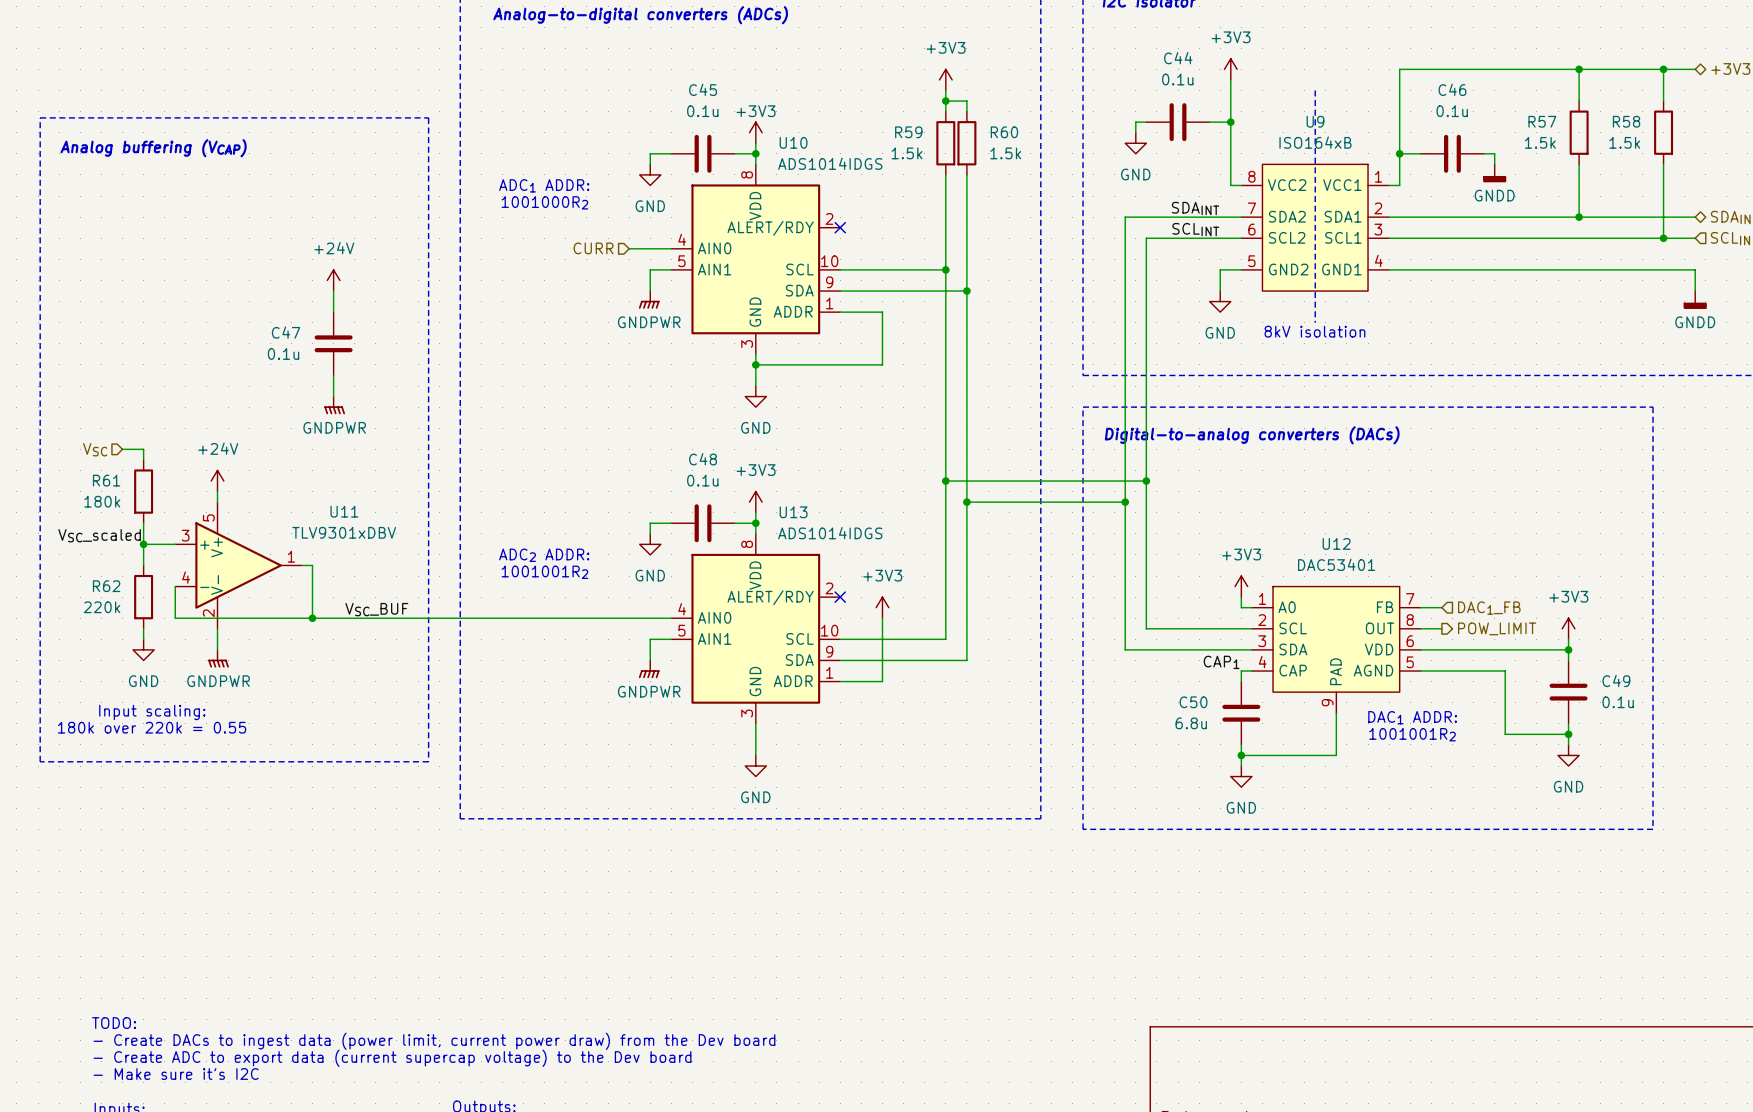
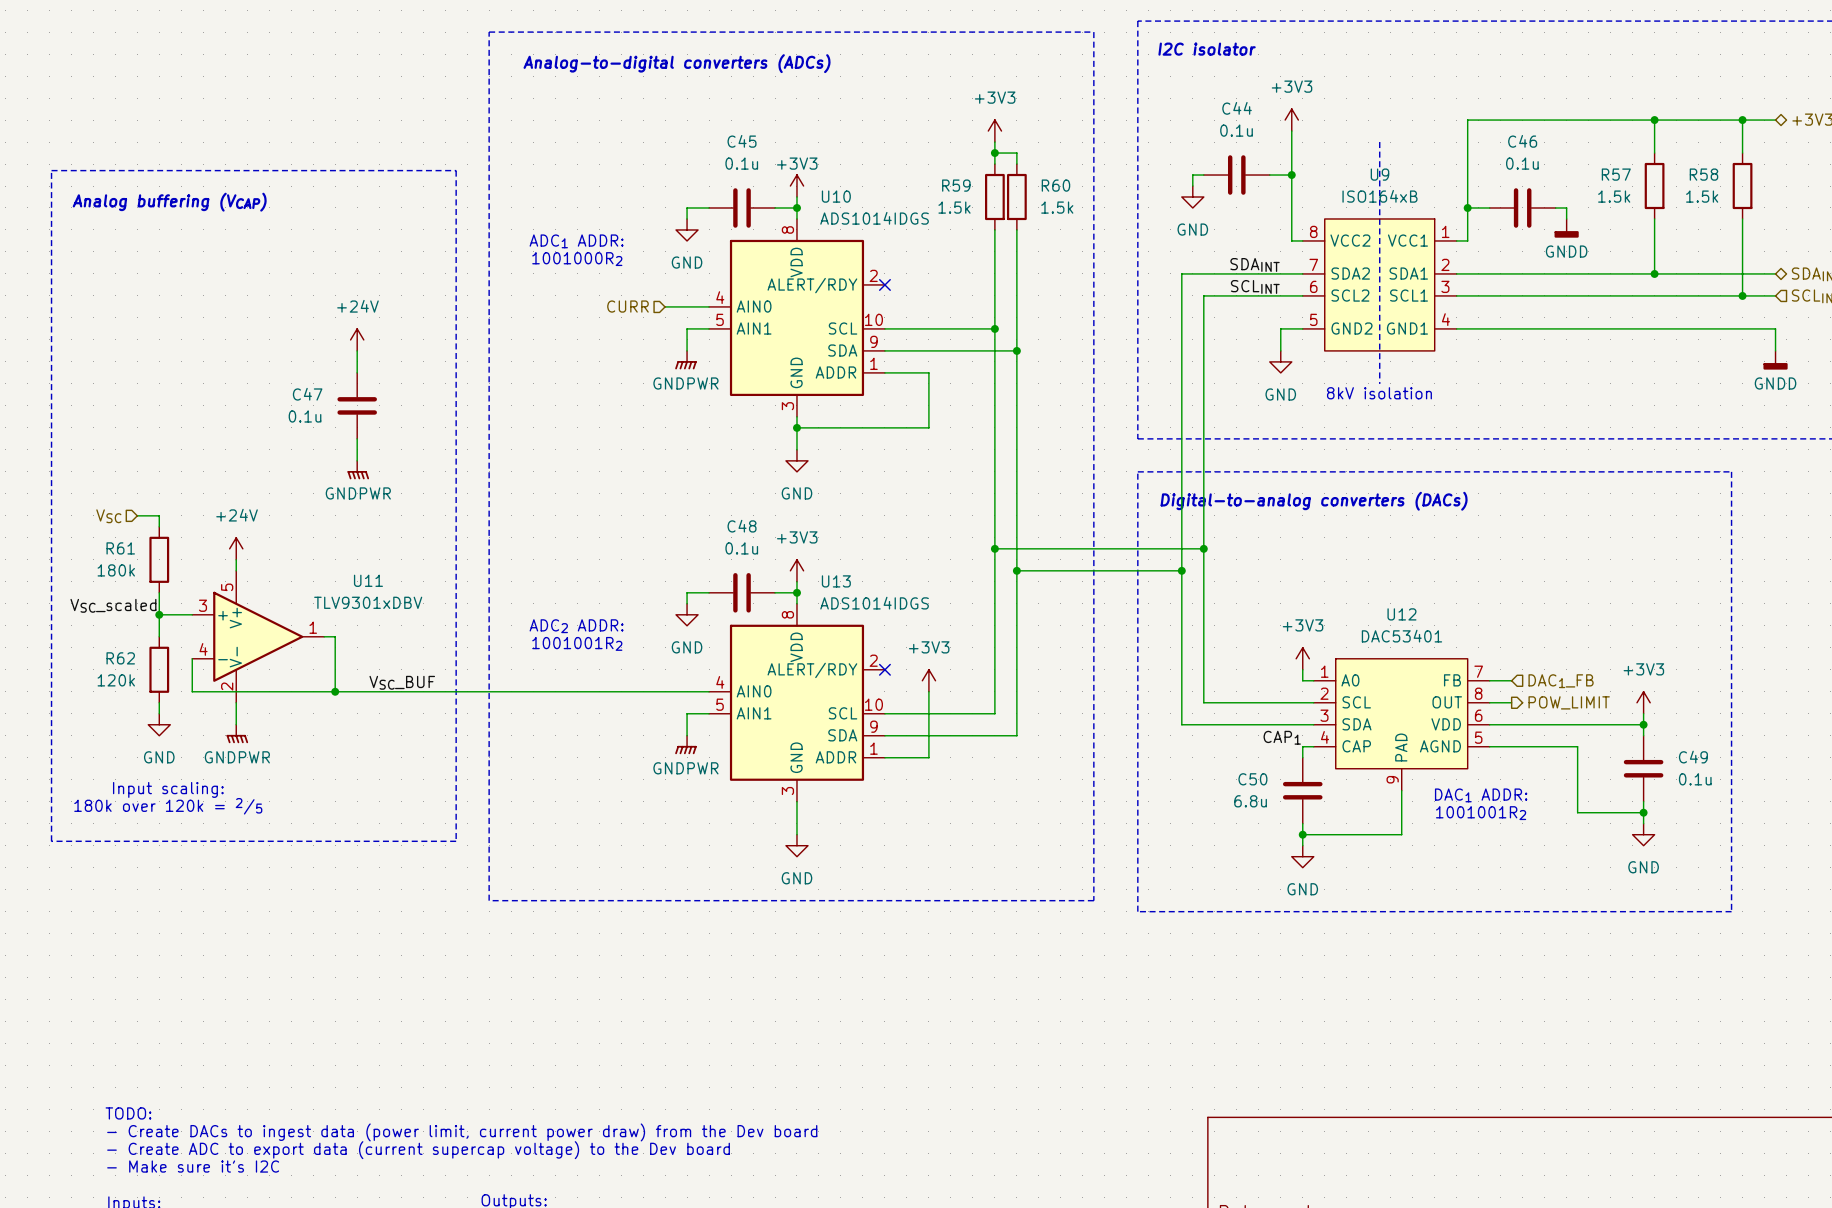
R62 value: 220k (102, 607) -> 120k (116, 680)
text: 180k over 220k = 0.55 (152, 727) -> 180k over 120k = 2/5 (168, 806)

